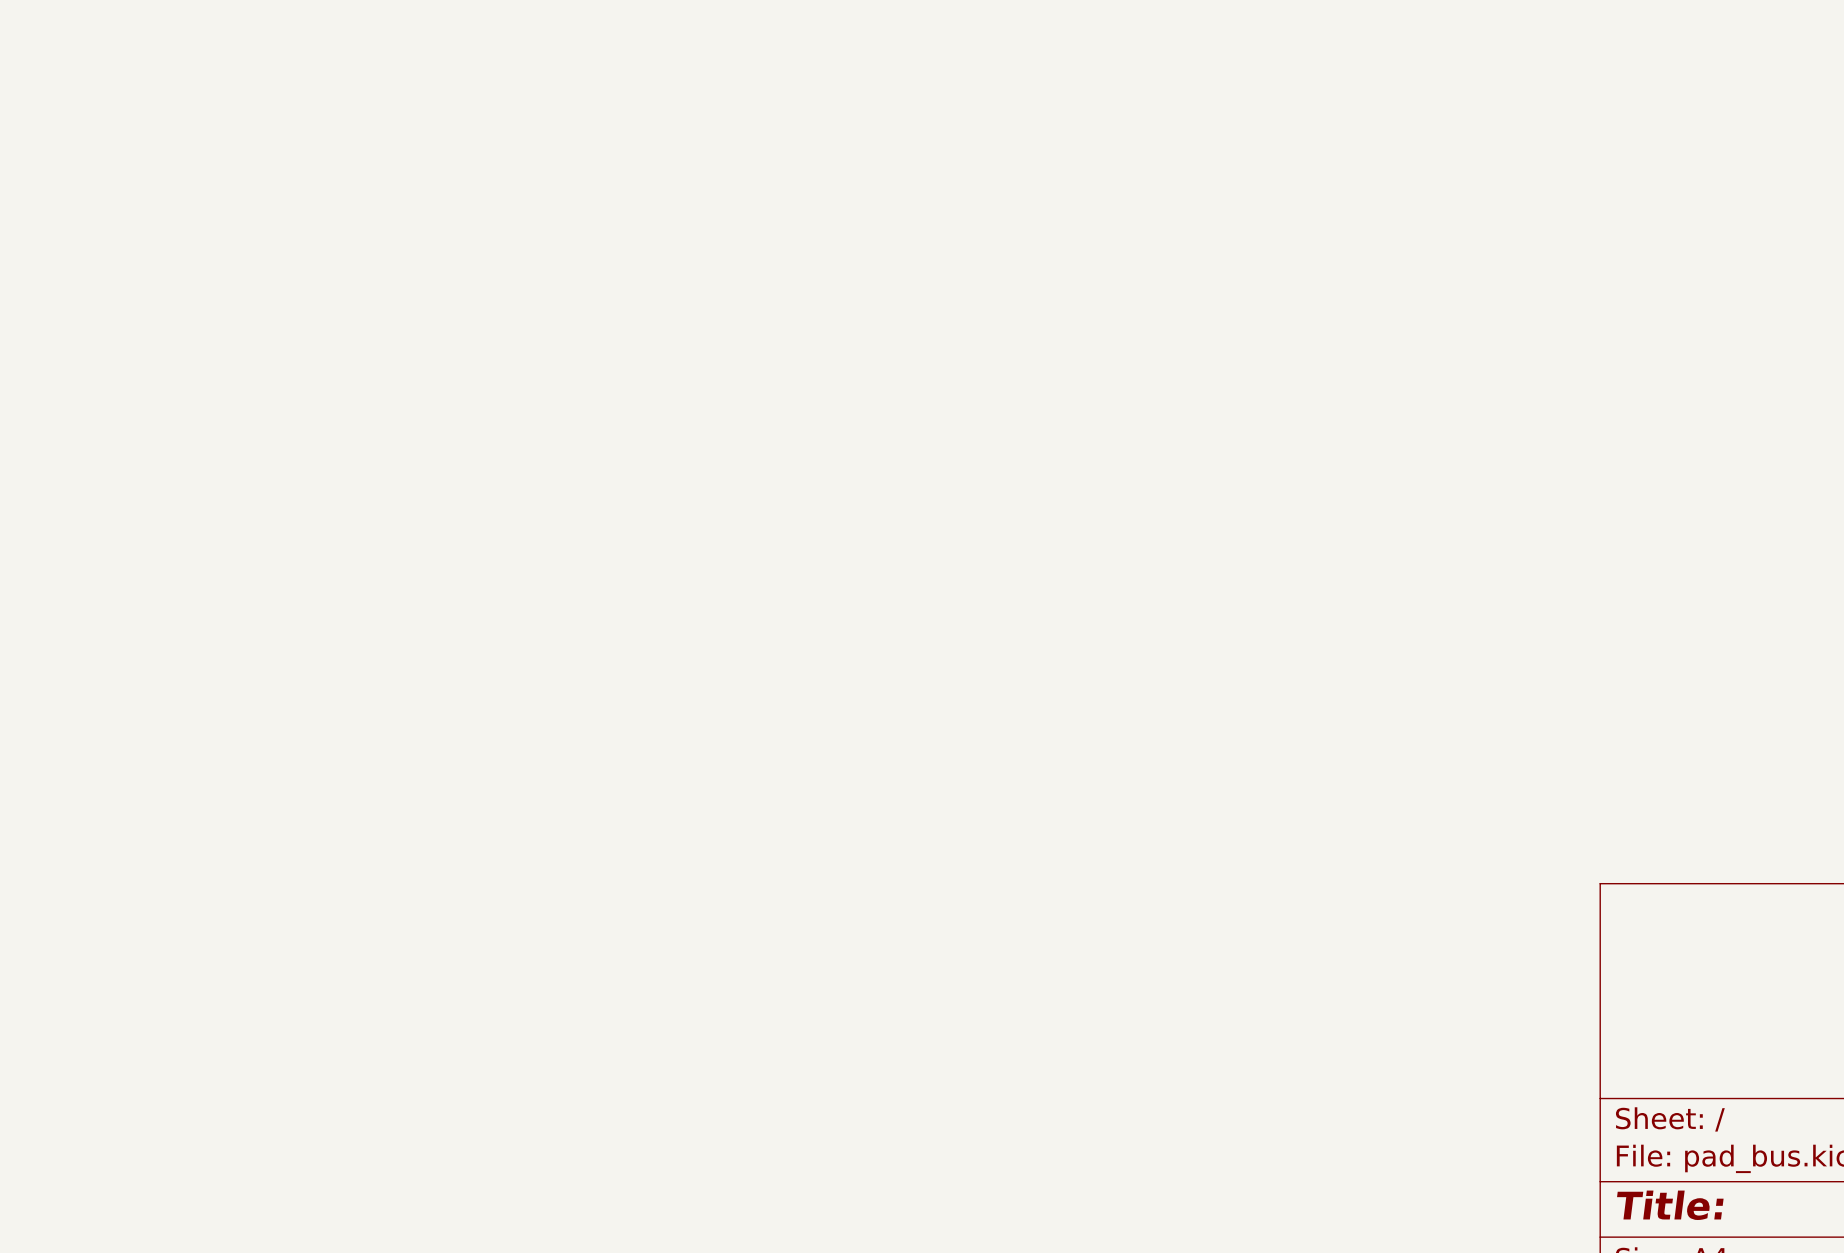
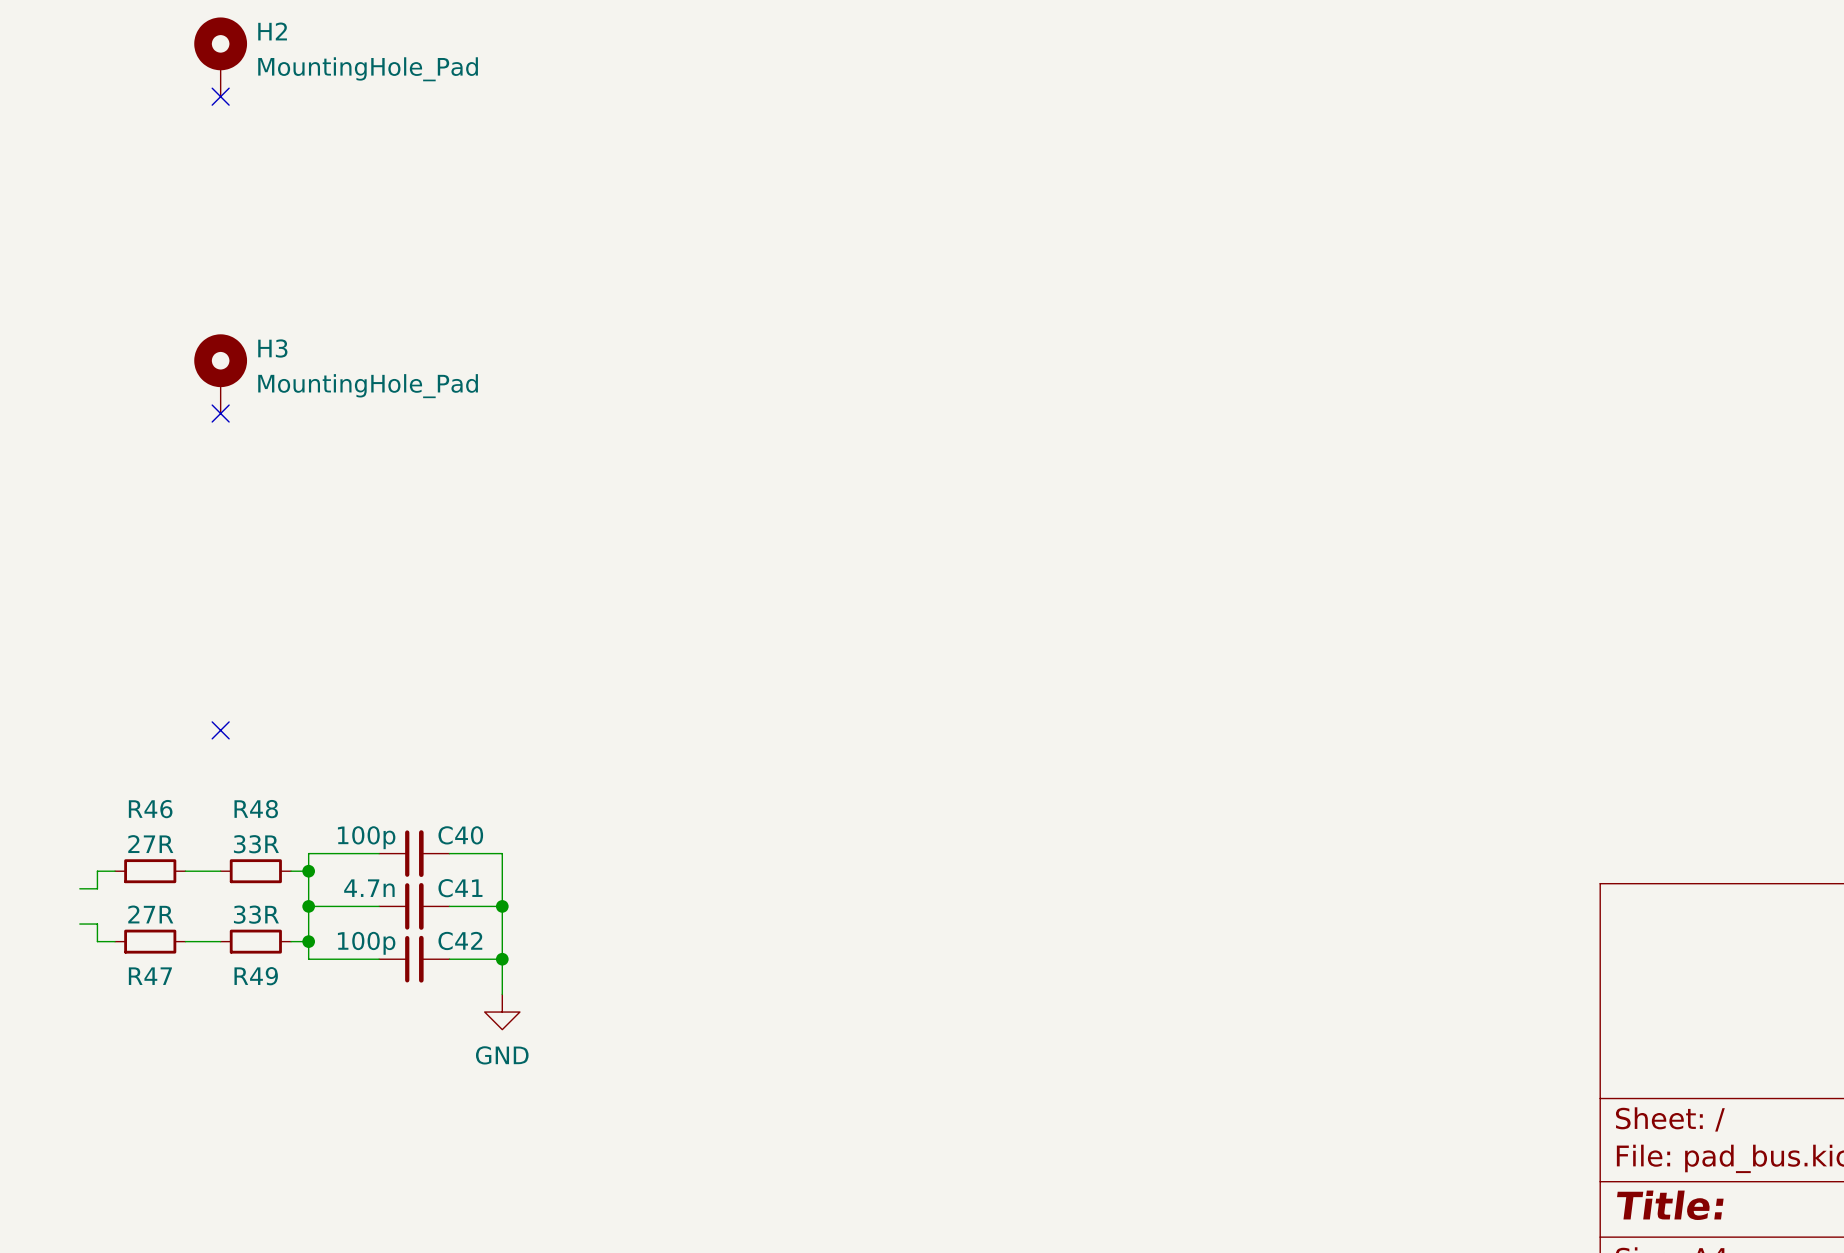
H2: none -> MountingHole_Pad (220, 57)
no-connect mark: none -> (220, 96)
H3: none -> MountingHole_Pad (220, 373)
no-connect mark: none -> (220, 413)
no-connect mark: none -> (220, 730)
wire: none -> (379, 853) (308, 853) (308, 959) (379, 959)
C40: none -> 100p (414, 853)
wire: none -> (449, 853) (502, 853) (502, 994)
wire: none -> (115, 871) (97, 871) (97, 888) (79, 888)
R46: none -> 27R (150, 871)
wire: none -> (185, 871) (220, 871)
R48: none -> 33R (255, 871)
wire: none -> (291, 871) (308, 871)
junction: none -> (308, 871)
wire: none -> (308, 906) (379, 906)
junction: none -> (308, 906)
C41: none -> 4.7n (414, 906)
wire: none -> (449, 906) (502, 906)
junction: none -> (502, 906)
wire: none -> (79, 924) (97, 924) (97, 941) (115, 941)
R47: none -> 27R (150, 941)
wire: none -> (185, 941) (220, 941)
R49: none -> 33R (255, 941)
wire: none -> (291, 941) (308, 941)
junction: none -> (308, 941)
C42: none -> 100p (414, 959)
wire: none -> (449, 959) (502, 959)
junction: none -> (502, 959)
power symbol: none -> GND (502, 1012)

